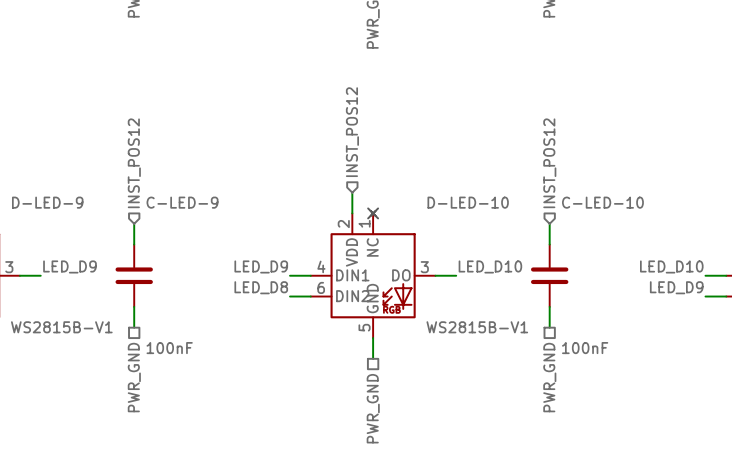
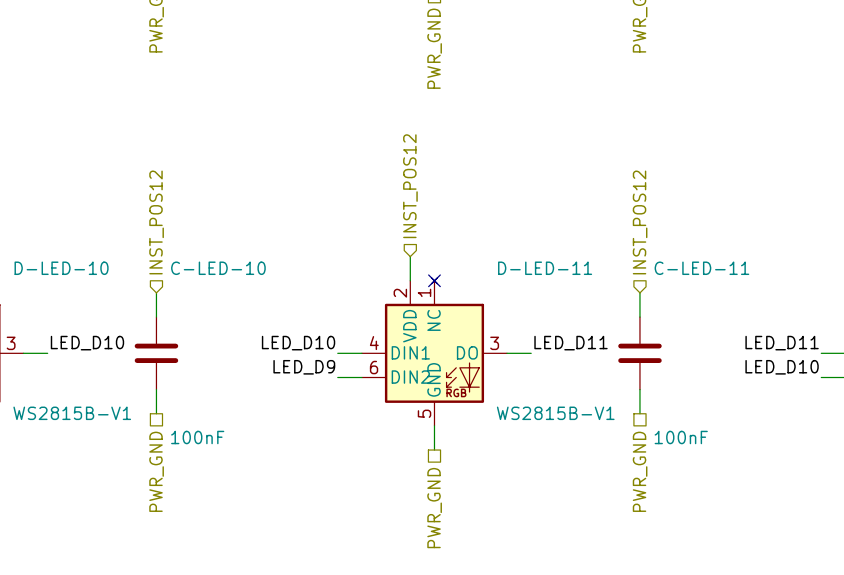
D-LED-9 name: D-LED-9 (47, 202) -> D-LED-10 (61, 268)
C-LED-9 name: C-LED-9 (182, 202) -> C-LED-10 (218, 268)
D-LED-10 name: D-LED-10 (468, 202) -> D-LED-11 (545, 268)
C-LED-10 name: C-LED-10 (602, 202) -> C-LED-11 (701, 268)
label: LED_D9 (69, 266) -> LED_D10 (87, 343)
label: LED_D9 (261, 266) -> LED_D10 (298, 343)
label: LED_D10 (490, 266) -> LED_D11 (570, 343)
label: LED_D10 (671, 266) -> LED_D11 (782, 343)
label: LED_D8 (261, 287) -> LED_D9 (304, 367)
label: LED_D9 (676, 287) -> LED_D10 (782, 367)

